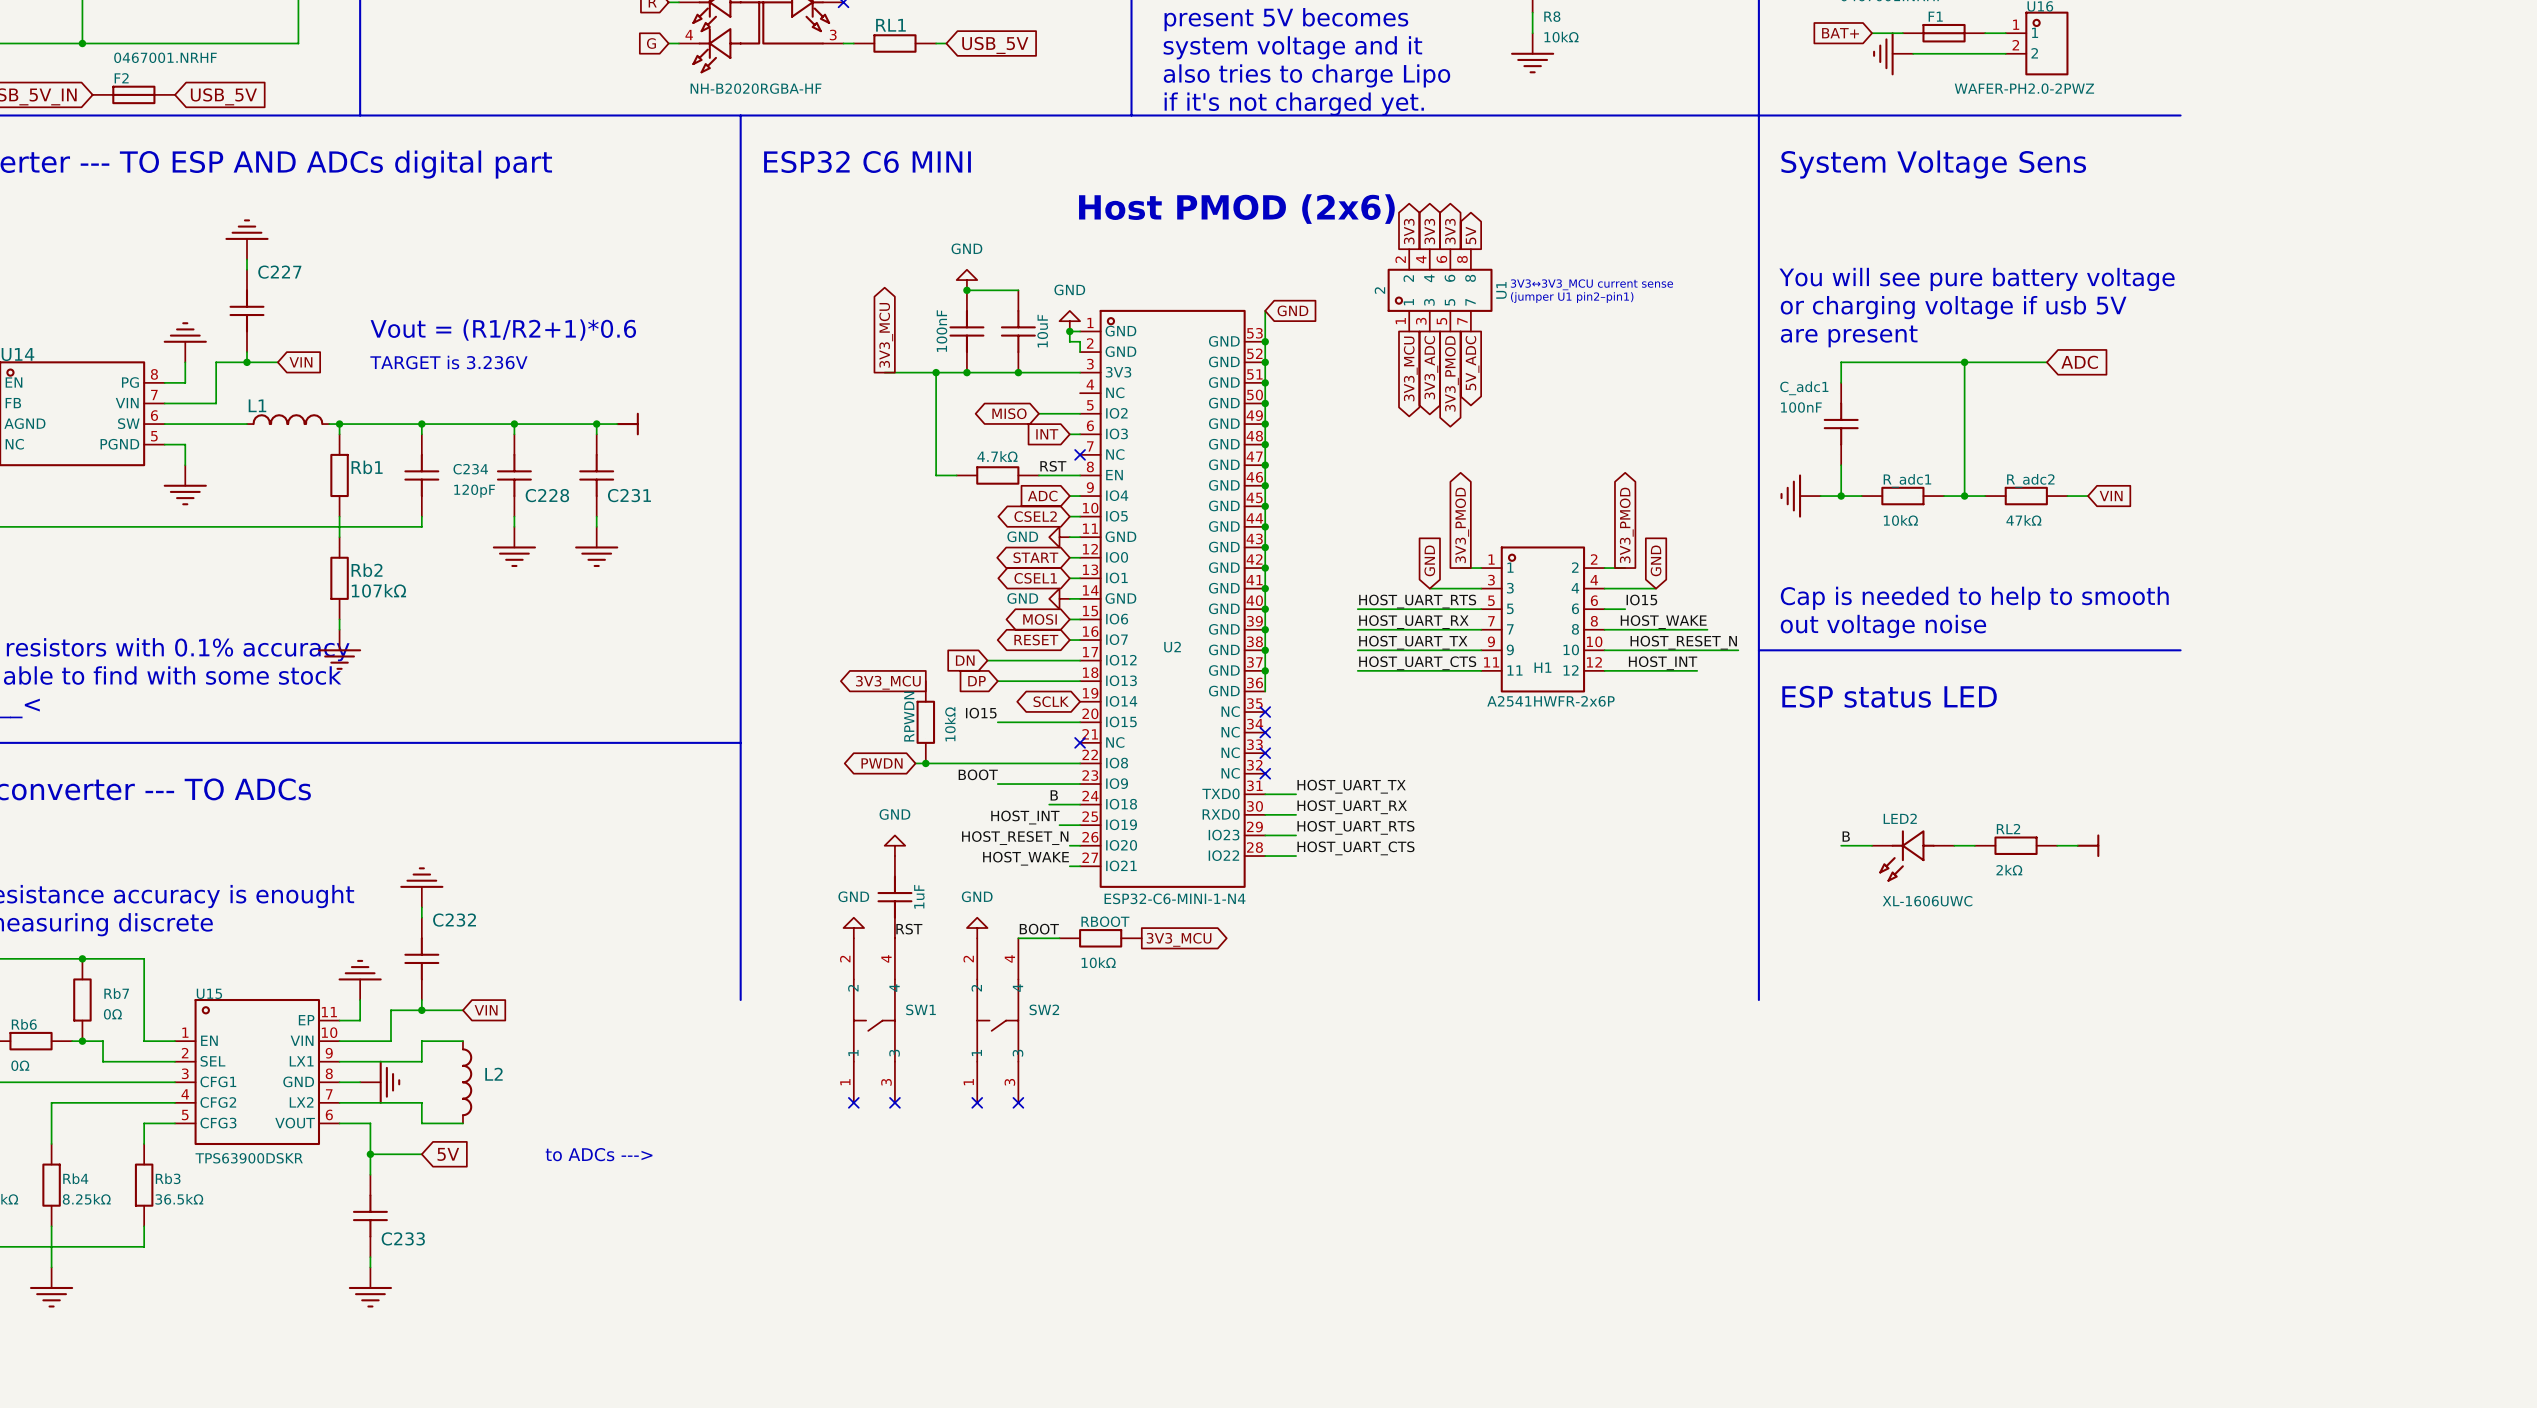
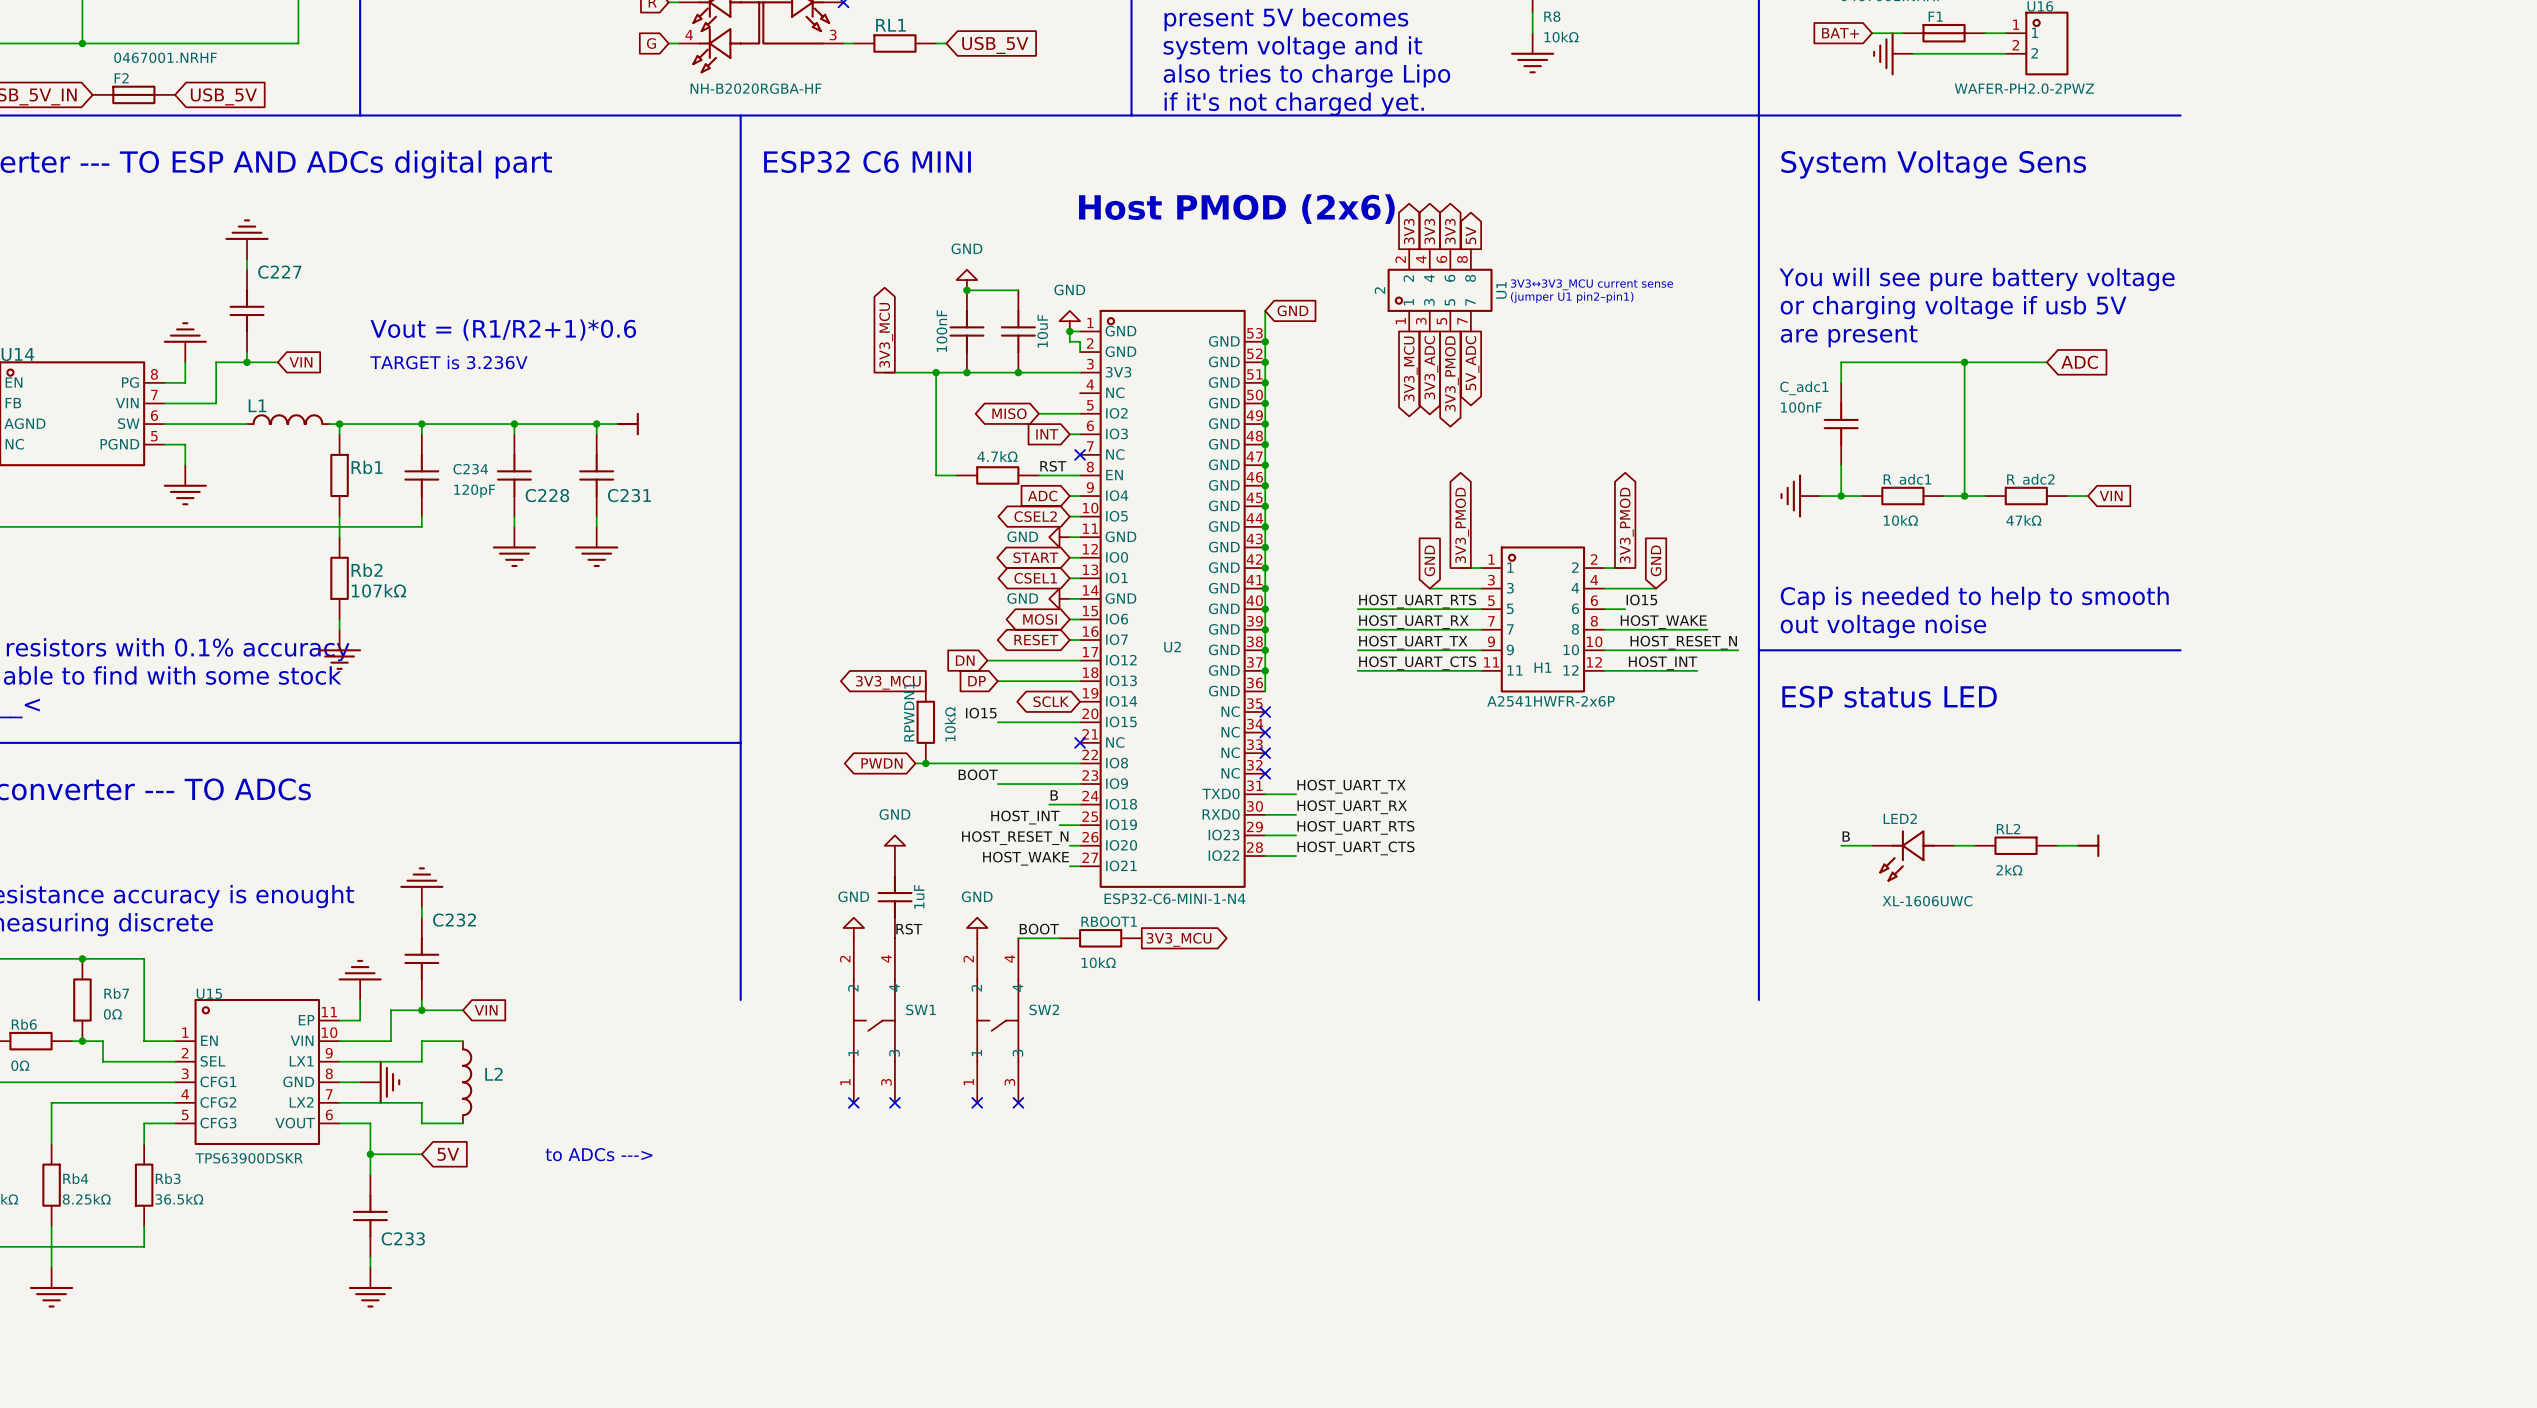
RPWDN name: RPWDN (909, 716) -> RPWDN1 (909, 712)
RBOOT name: RBOOT (1105, 921) -> RBOOT1 (1109, 921)

